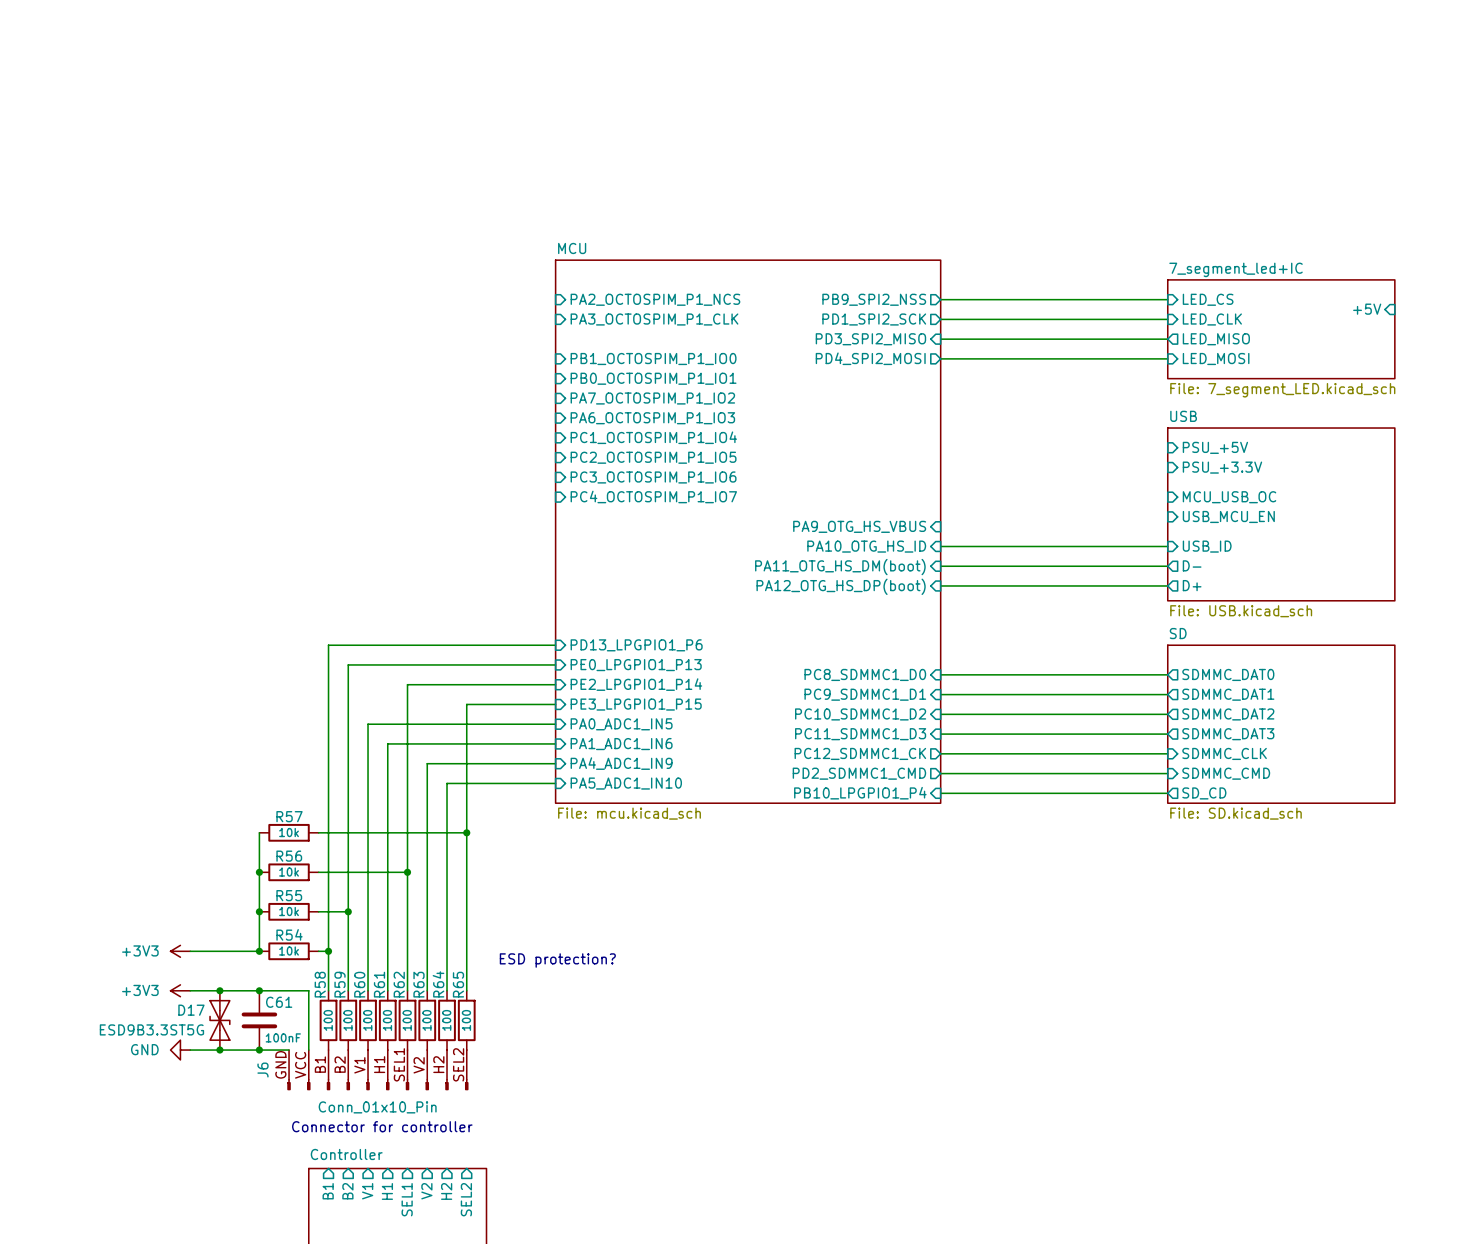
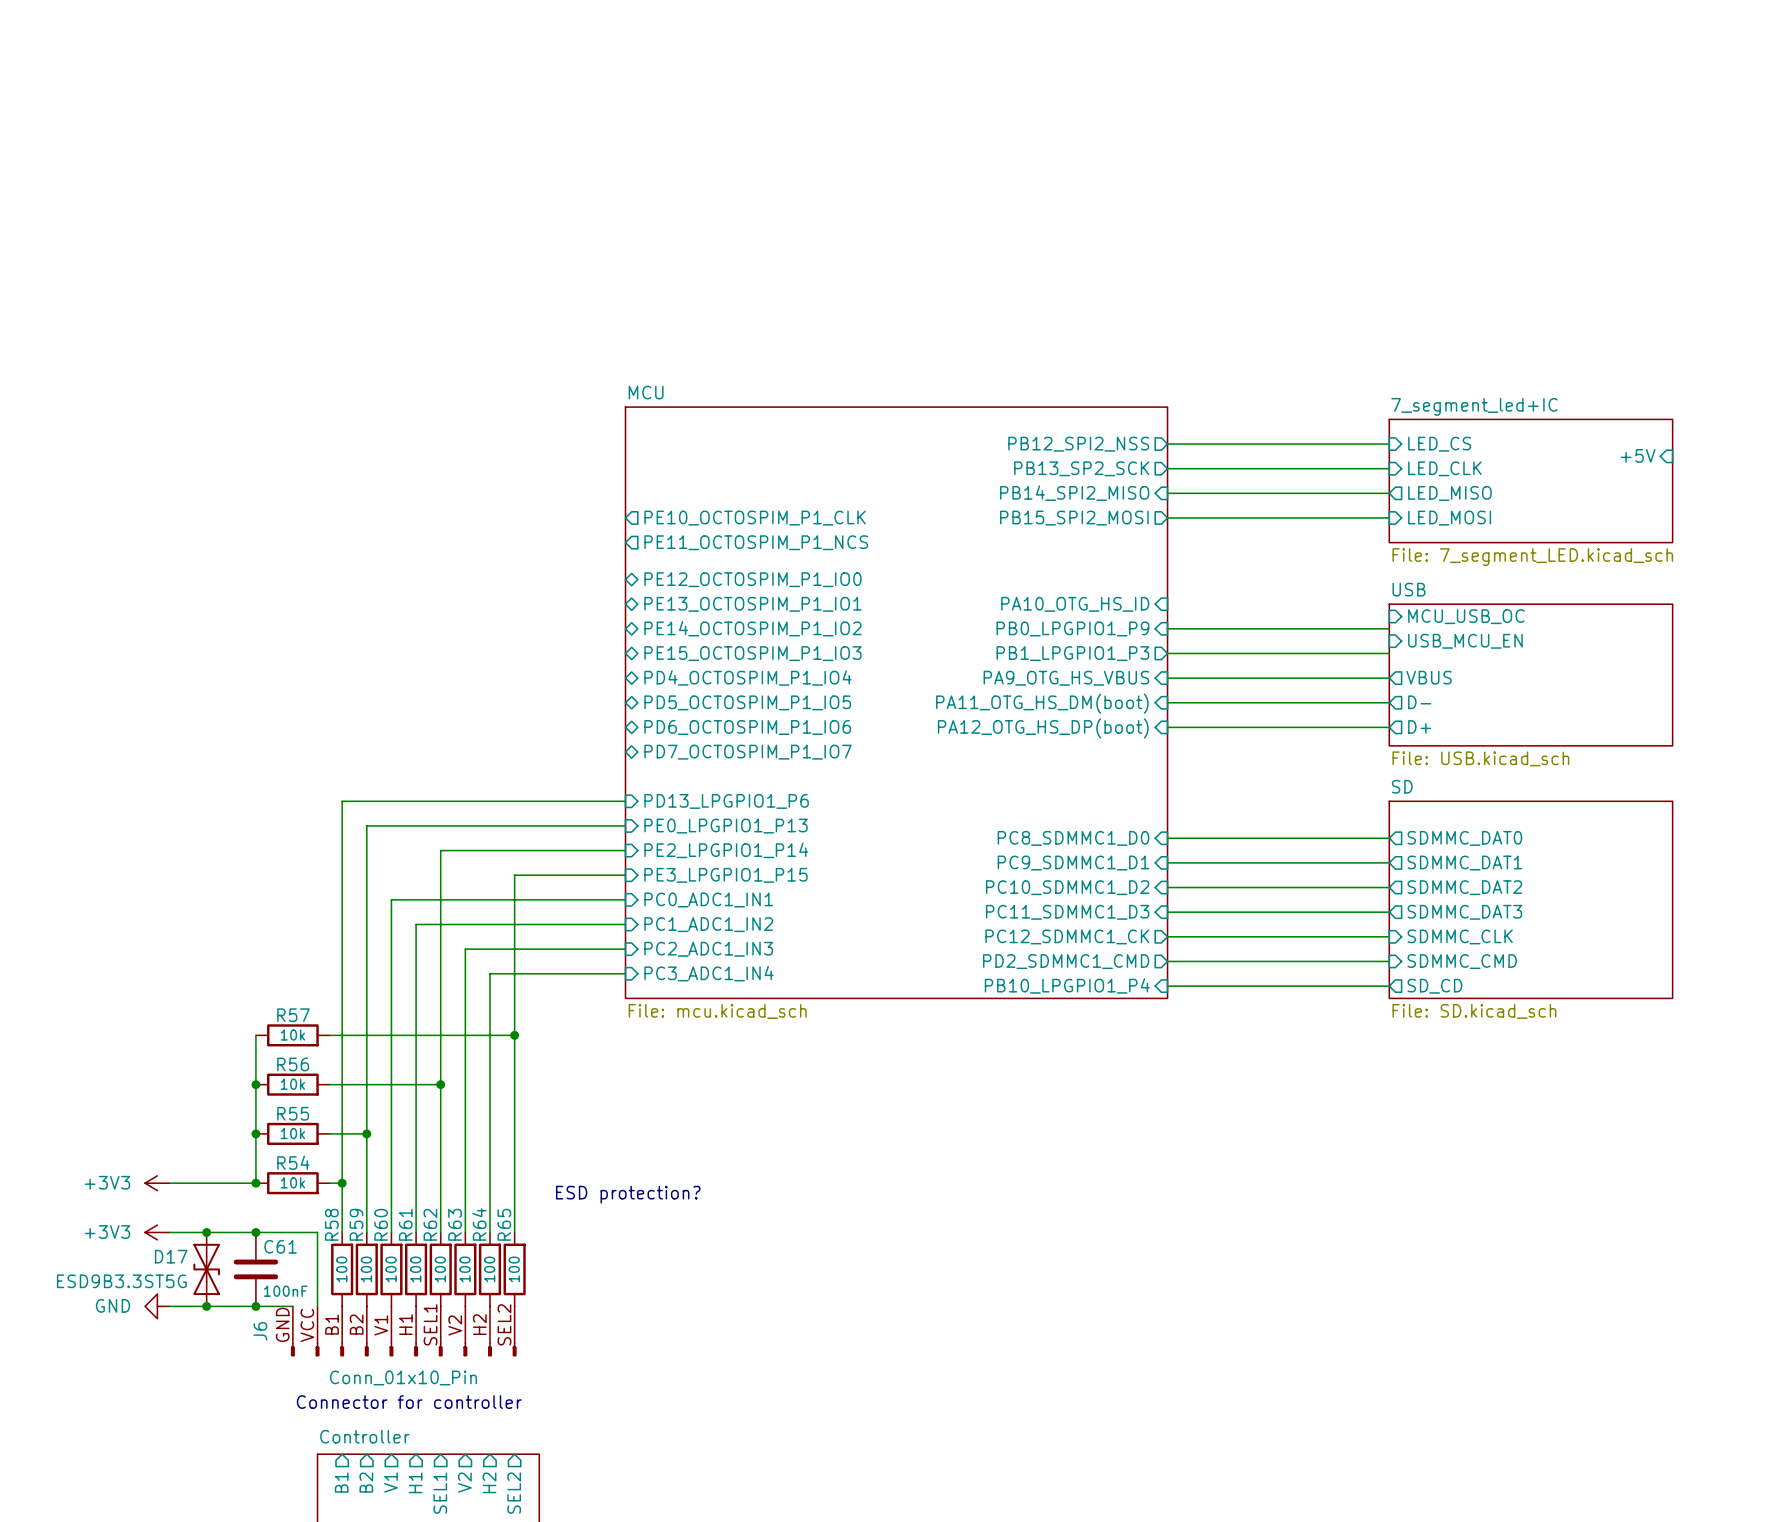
sheet pin: PA2_OCTOSPIM_P1_NCS (655, 299) -> none
sheet pin: PB9_SPI2_NSS (874, 299) -> none
wire: (940, 299) (1167, 299) -> none
sheet pin: LED_CS (1208, 299) -> none
sheet pin position: +5V (1367, 309) -> +5V (1638, 455)
sheet pin: PA3_OCTOSPIM_P1_CLK (654, 319) -> none
sheet pin: PD1_SPI2_SCK (874, 319) -> none
wire: (940, 319) (1167, 319) -> none
sheet pin position: LED_CLK (1212, 319) -> LED_CLK (1444, 468)
sheet 7_segment_led+IC position: (1281, 329) -> (1530, 481)
sheet pin: PD3_SPI2_MISO (870, 339) -> none
wire: (940, 339) (1167, 339) -> none
sheet pin position: LED_MISO (1216, 339) -> LED_MISO (1449, 493)
sheet pin: PD4_SPI2_MOSI (870, 358) -> none
wire: (940, 358) (990, 358) -> none
sheet pin: PB1_OCTOSPIM_P1_IO0 (653, 359) -> none
sheet pin: none -> PB12_SPI2_NSS (1078, 444)
sheet pin: LED_MOSI (1216, 359) -> LED_CS (1439, 444)
sheet pin: PB0_OCTOSPIM_P1_IO1 (653, 378) -> none
sheet pin: none -> PB13_SP2_SCK (1081, 468)
wire: none -> (1167, 468) (1389, 468)
sheet pin: PA7_OCTOSPIM_P1_IO2 (652, 398) -> none
sheet pin: none -> PB14_SPI2_MISO (1074, 493)
wire: none -> (1167, 493) (1389, 493)
sheet pin shape: input (652, 418) -> output (755, 518)
sheet pin: PA6_OCTOSPIM_P1_IO3 (652, 418) -> PE10_OCTOSPIM_P1_CLK (755, 518)
sheet pin: none -> PB15_SPI2_MOSI (1074, 518)
wire: none -> (1167, 517) (1389, 517)
sheet pin: none -> LED_MOSI (1449, 518)
sheet pin shape: input (653, 437) -> output (756, 542)
sheet pin: PC1_OCTOSPIM_P1_IO4 (653, 437) -> PE11_OCTOSPIM_P1_NCS (756, 542)
sheet pin: PSU_+5V (1215, 447) -> none
sheet pin: PC2_OCTOSPIM_P1_IO5 (653, 457) -> none
sheet pin: none -> PE12_OCTOSPIM_P1_IO0 (752, 579)
sheet pin: PSU_+3.3V (1222, 467) -> none
sheet pin: PC3_OCTOSPIM_P1_IO6 (653, 477) -> none
sheet pin: none -> PE13_OCTOSPIM_P1_IO1 (752, 604)
sheet pin: PC4_OCTOSPIM_P1_IO7 (653, 496) -> none
sheet pin: none -> PE14_OCTOSPIM_P1_IO2 (752, 628)
sheet pin: none -> PB0_LPGPIO1_P9 (1072, 628)
wire: none -> (1167, 628) (1389, 628)
sheet USB: File: USB.kicad_sch (1281, 514) -> none
sheet pin: none -> PE15_OCTOSPIM_P1_IO3 (752, 653)
sheet pin position: PA9_OTG_HS_VBUS (859, 526) -> PA9_OTG_HS_VBUS (1066, 678)
sheet pin: none -> PB1_LPGPIO1_P3 (1072, 653)
wire: none -> (1167, 653) (1389, 653)
sheet MCU: File: mcu.kicad_sch (748, 531) -> none
sheet USB: none -> File: USB.kicad_sch (1530, 675)
sheet pin: none -> PD4_OCTOSPIM_P1_IO4 (748, 677)
sheet pin position: PA10_OTG_HS_ID (866, 546) -> PA10_OTG_HS_ID (1075, 604)
wire: (940, 546) (990, 546) -> none
sheet pin shape: input (1207, 546) -> output (1429, 677)
sheet pin: USB_ID (1207, 546) -> VBUS (1429, 677)
sheet pin: none -> PD5_OCTOSPIM_P1_IO5 (747, 702)
sheet MCU: none -> File: mcu.kicad_sch (896, 702)
wire: (940, 566) (990, 566) -> none
sheet pin position: PA11_OTG_HS_DM(boot) (840, 567) -> PA11_OTG_HS_DM(boot) (1042, 703)
wire: (940, 585) (990, 585) -> none
sheet pin: none -> PD6_OCTOSPIM_P1_IO6 (747, 727)
sheet pin position: PA12_OTG_HS_DP(boot) (841, 586) -> PA12_OTG_HS_DP(boot) (1043, 728)
sheet pin: none -> PD7_OCTOSPIM_P1_IO7 (748, 752)
sheet pin position: PC8_SDMMC1_D0 (865, 674) -> PC8_SDMMC1_D0 (1073, 838)
wire: (940, 674) (990, 674) -> none
sheet pin position: PC9_SDMMC1_D1 (865, 694) -> PC9_SDMMC1_D1 (1073, 863)
wire: (940, 694) (990, 694) -> none
sheet pin position: PC10_SDMMC1_D2 (860, 714) -> PC10_SDMMC1_D2 (1067, 887)
wire: (940, 714) (990, 714) -> none
sheet pin: PA0_ADC1_IN5 (621, 724) -> PC0_ADC1_IN1 (708, 899)
sheet pin position: PC11_SDMMC1_D3 (860, 734) -> PC11_SDMMC1_D3 (1067, 912)
wire: (940, 734) (990, 734) -> none
sheet pin: PA1_ADC1_IN6 (621, 744) -> PC1_ADC1_IN2 (708, 924)
sheet pin position: PC12_SDMMC1_CK (860, 753) -> PC12_SDMMC1_CK (1067, 936)
wire: (940, 753) (990, 753) -> none
sheet pin: PA4_ADC1_IN9 (621, 763) -> PC2_ADC1_IN3 (708, 949)
sheet pin position: PD2_SDMMC1_CMD (859, 773) -> PD2_SDMMC1_CMD (1066, 961)
wire: (940, 773) (990, 773) -> none
sheet pin: PA5_ADC1_IN10 (626, 783) -> PC3_ADC1_IN4 (708, 973)
sheet pin position: PB10_LPGPIO1_P4 (860, 793) -> PB10_LPGPIO1_P4 (1067, 985)
wire: (940, 793) (990, 793) -> none

